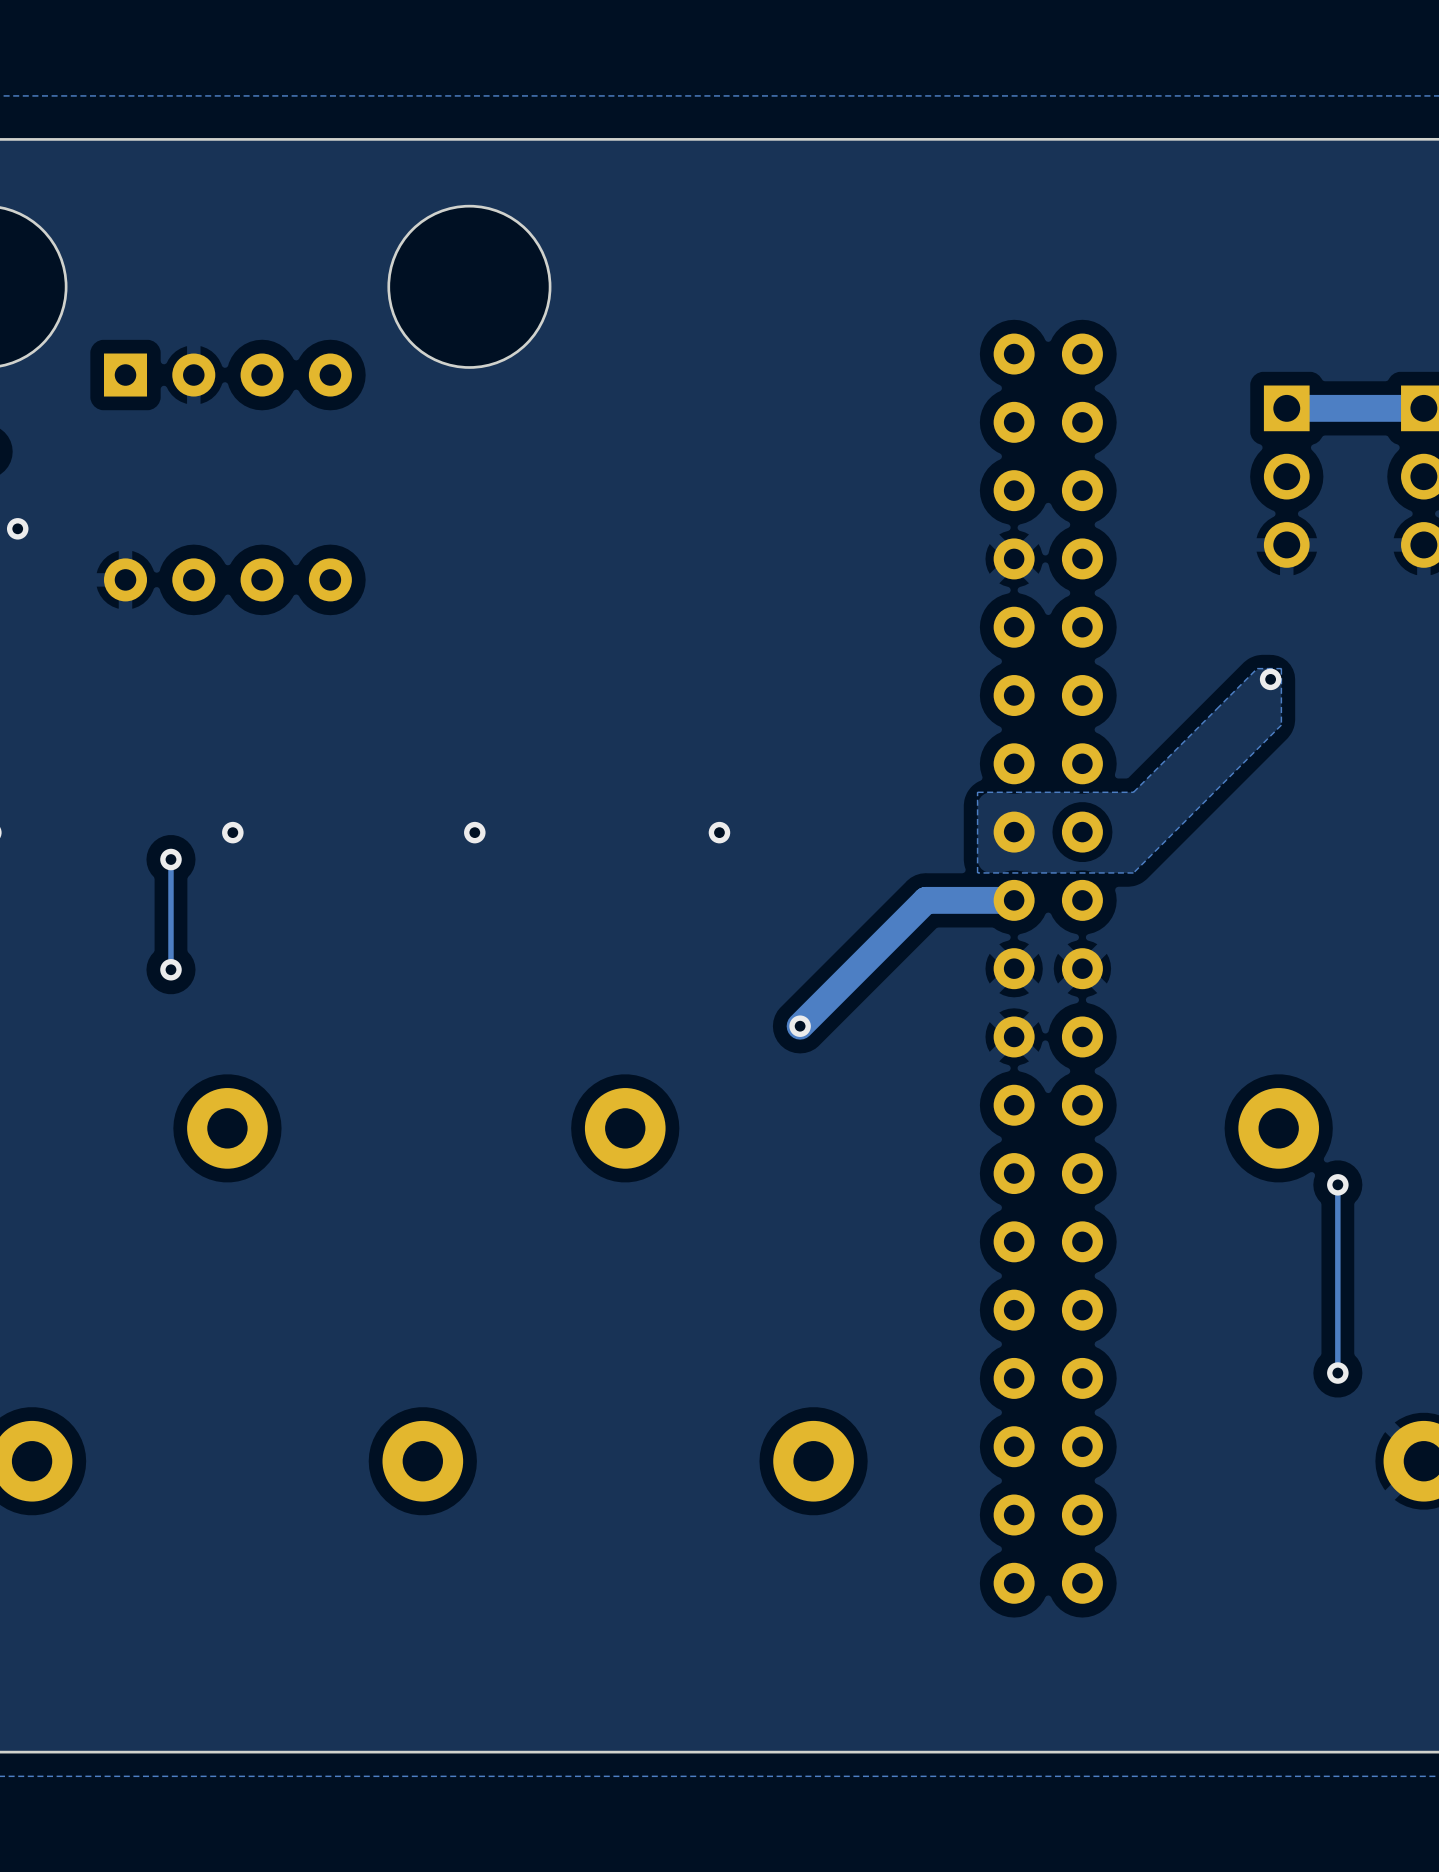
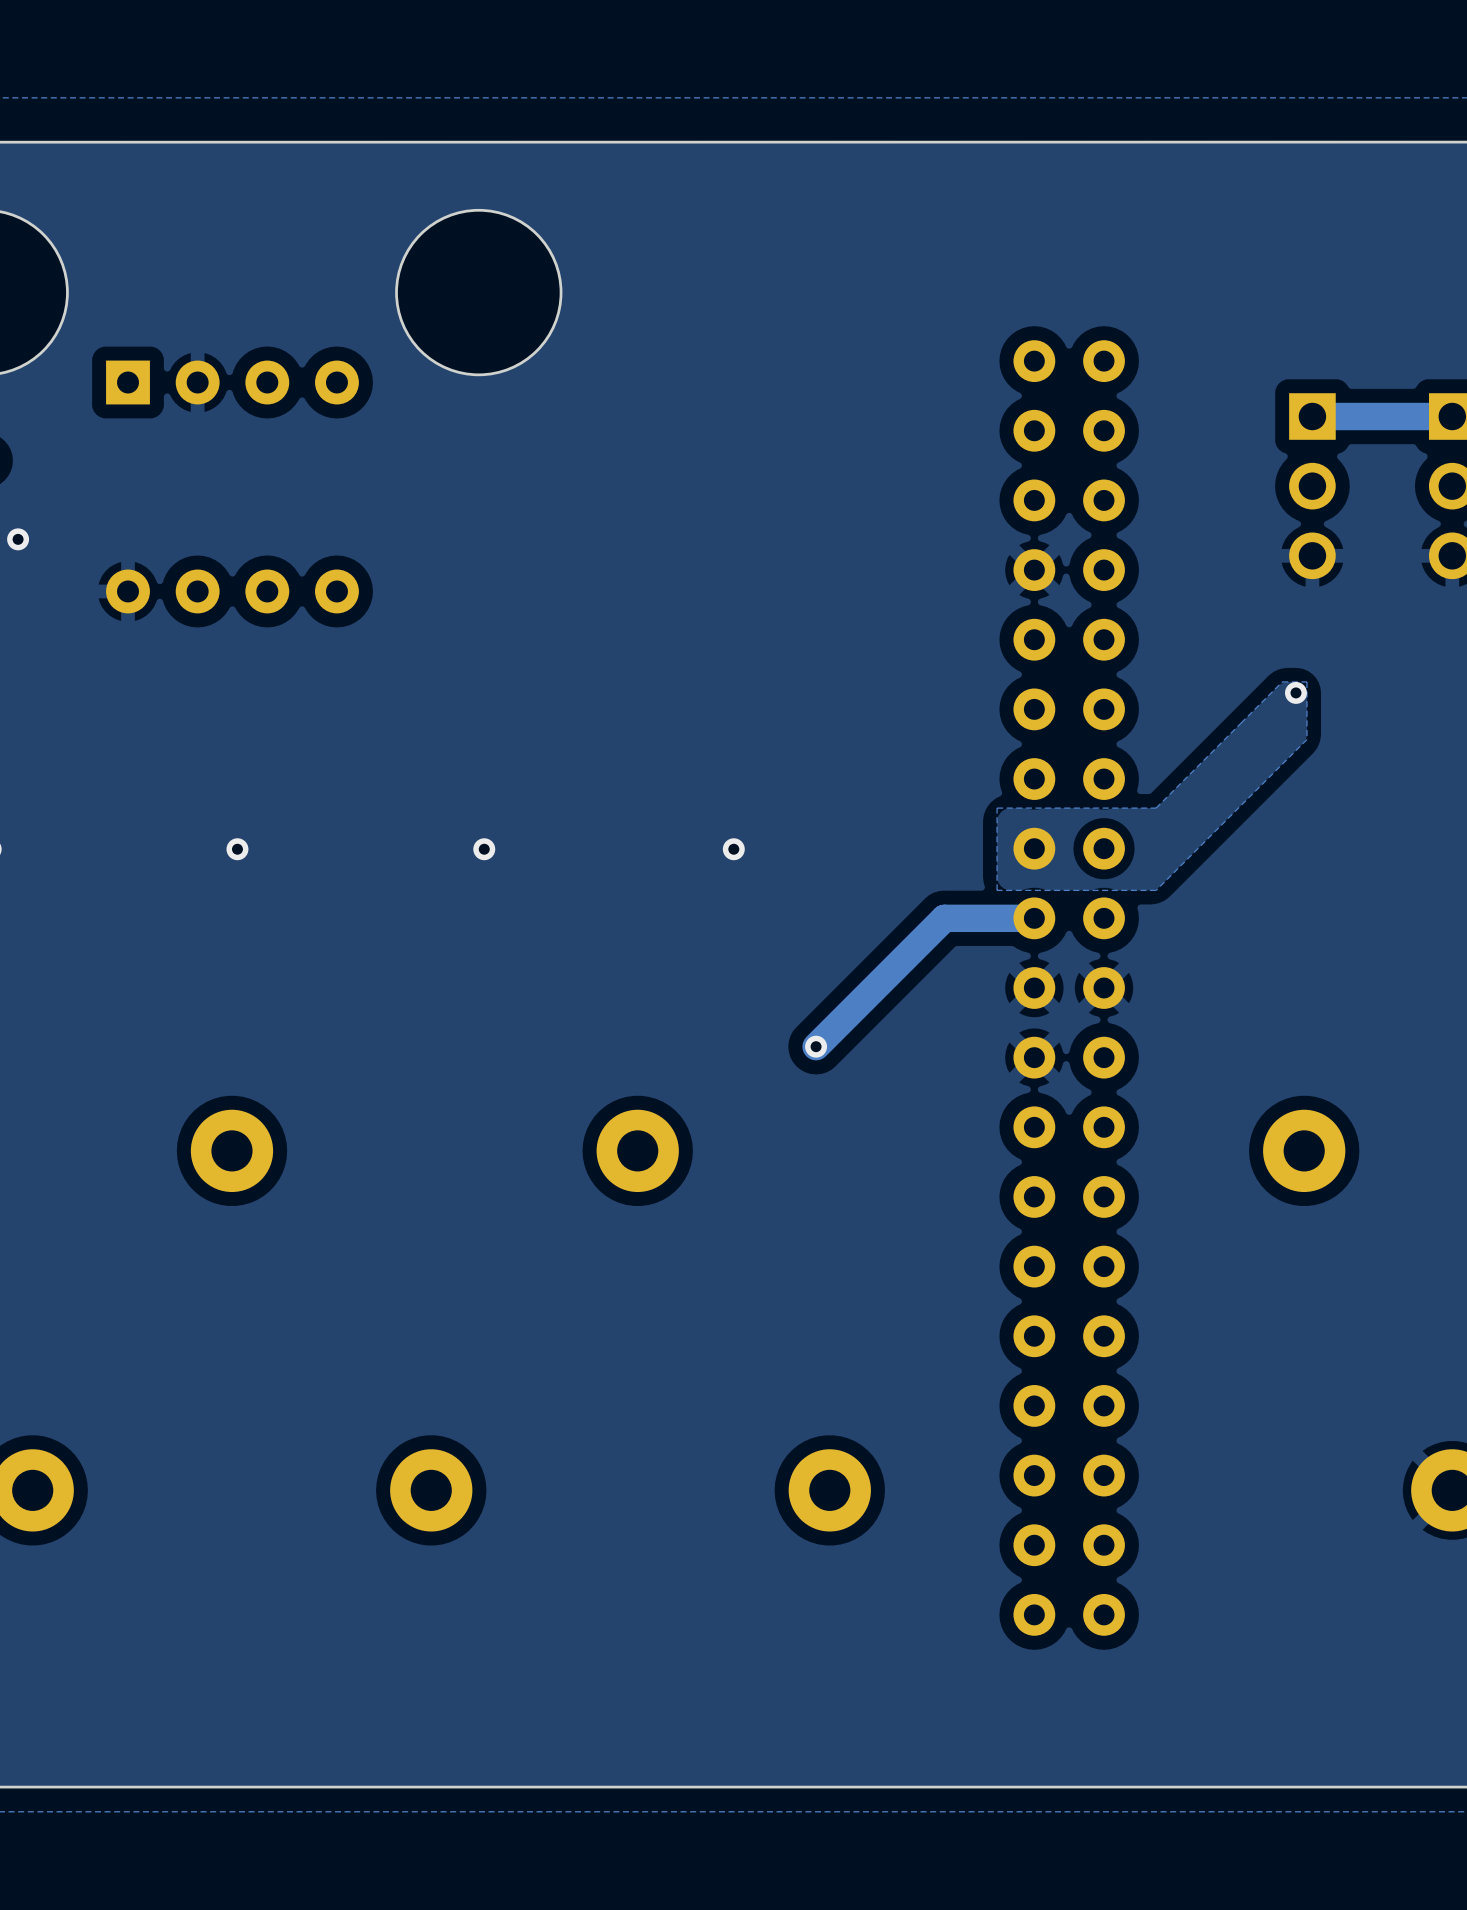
track: (170, 859) (170, 969) -> none
via: (170, 859) -> none
via: (170, 969) -> none
track: (1337, 1184) (1337, 1373) -> none
via: (1337, 1184) -> none
via: (1337, 1373) -> none

